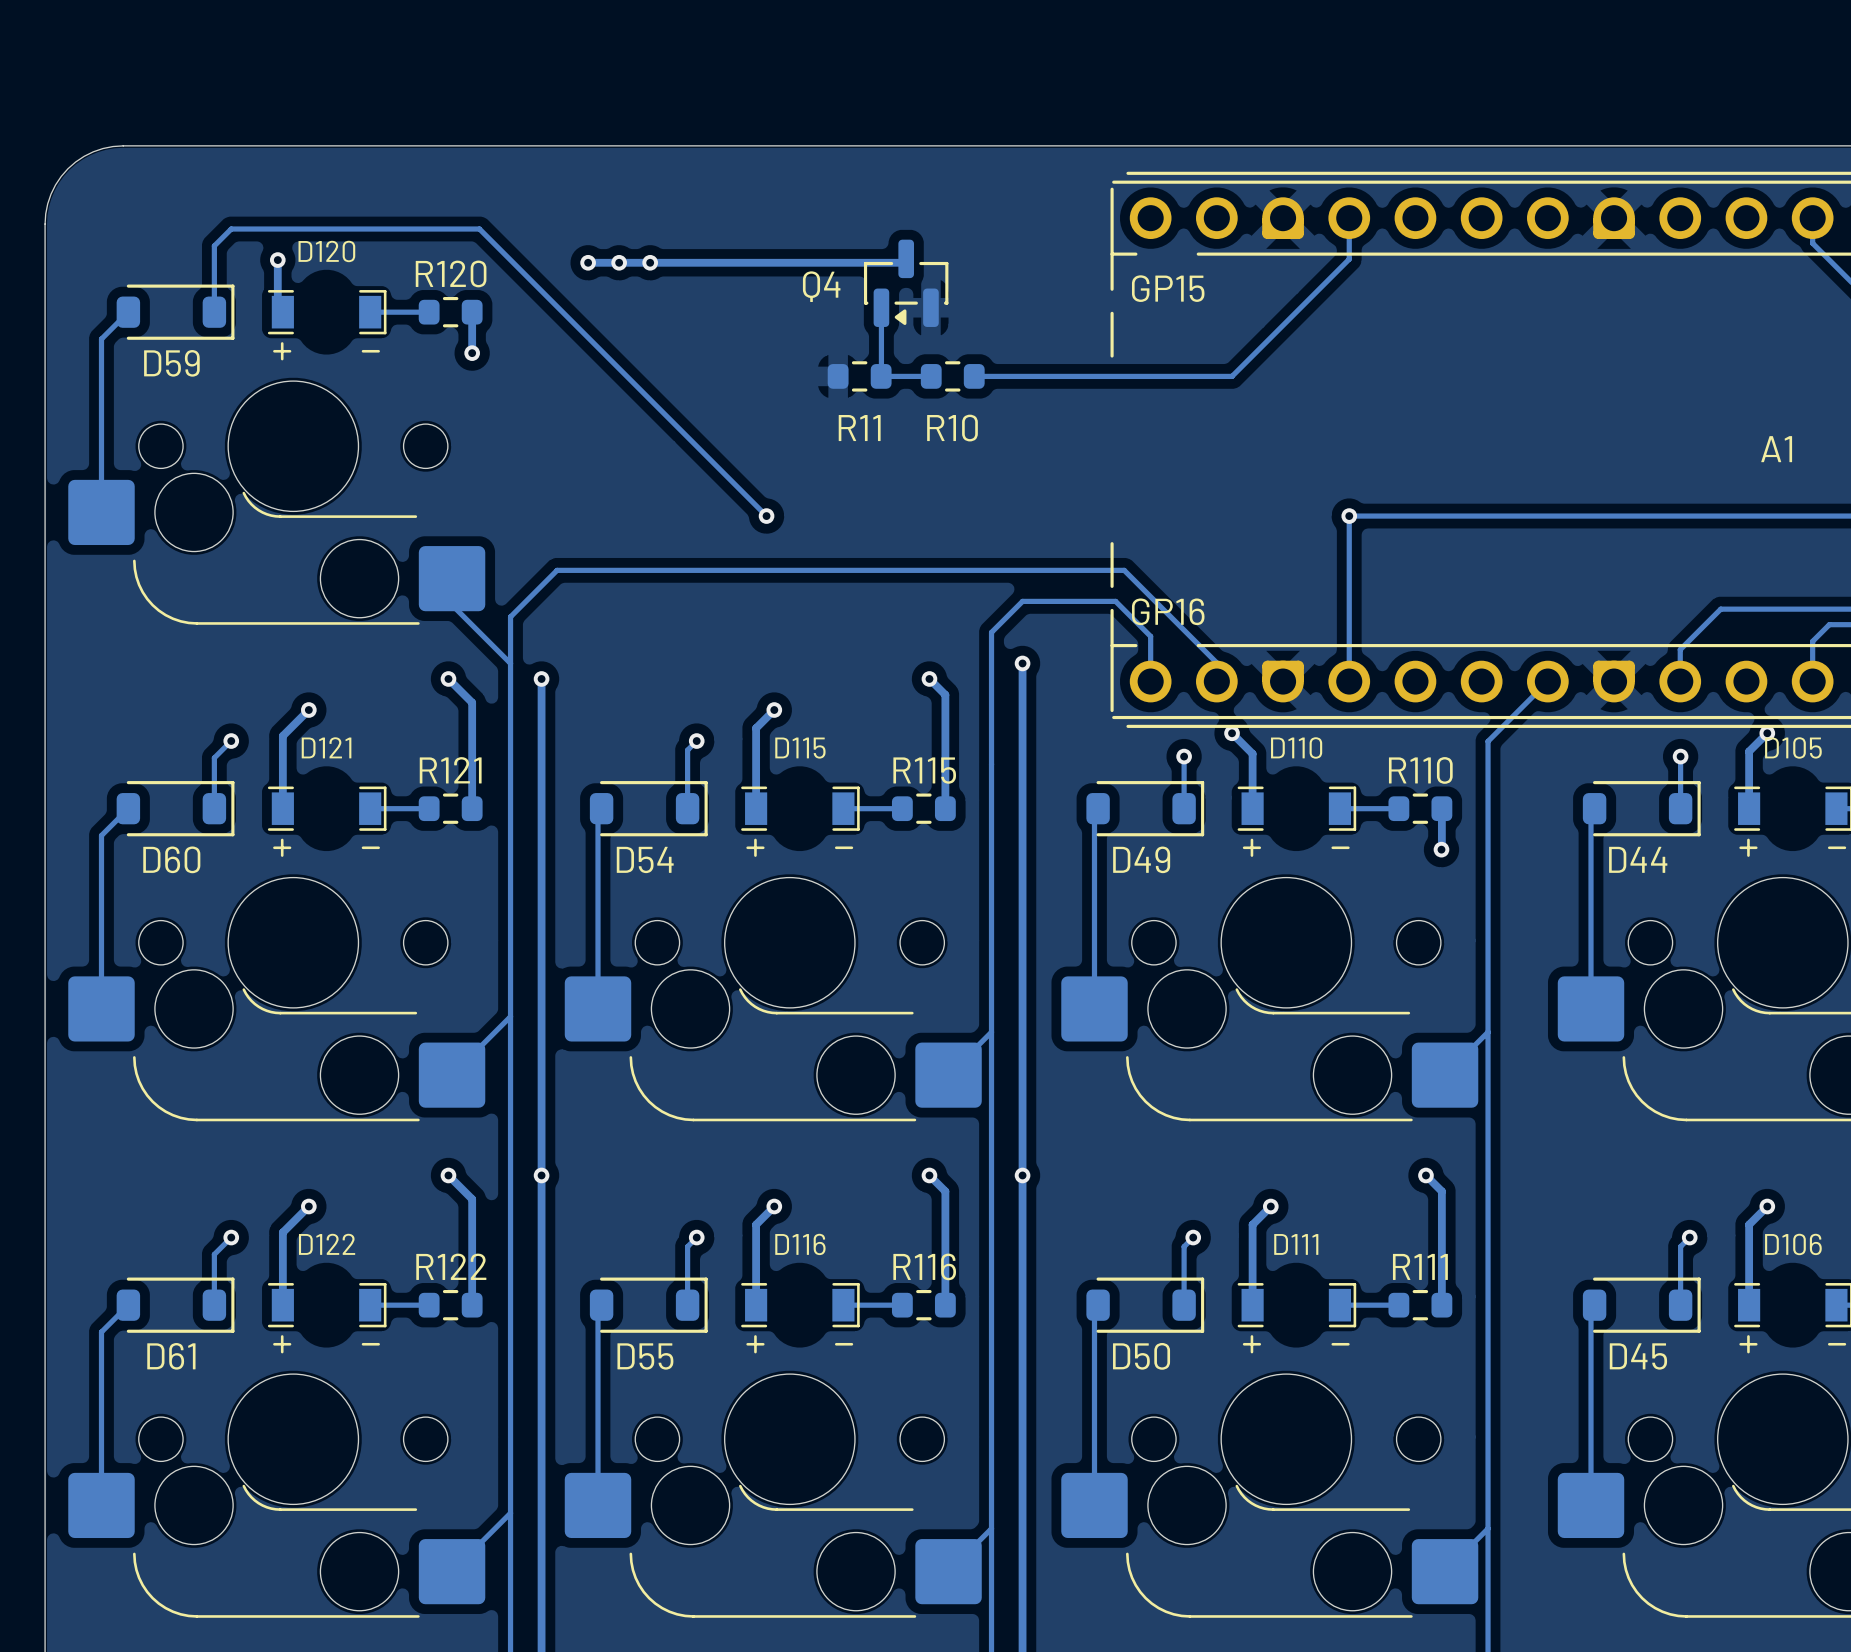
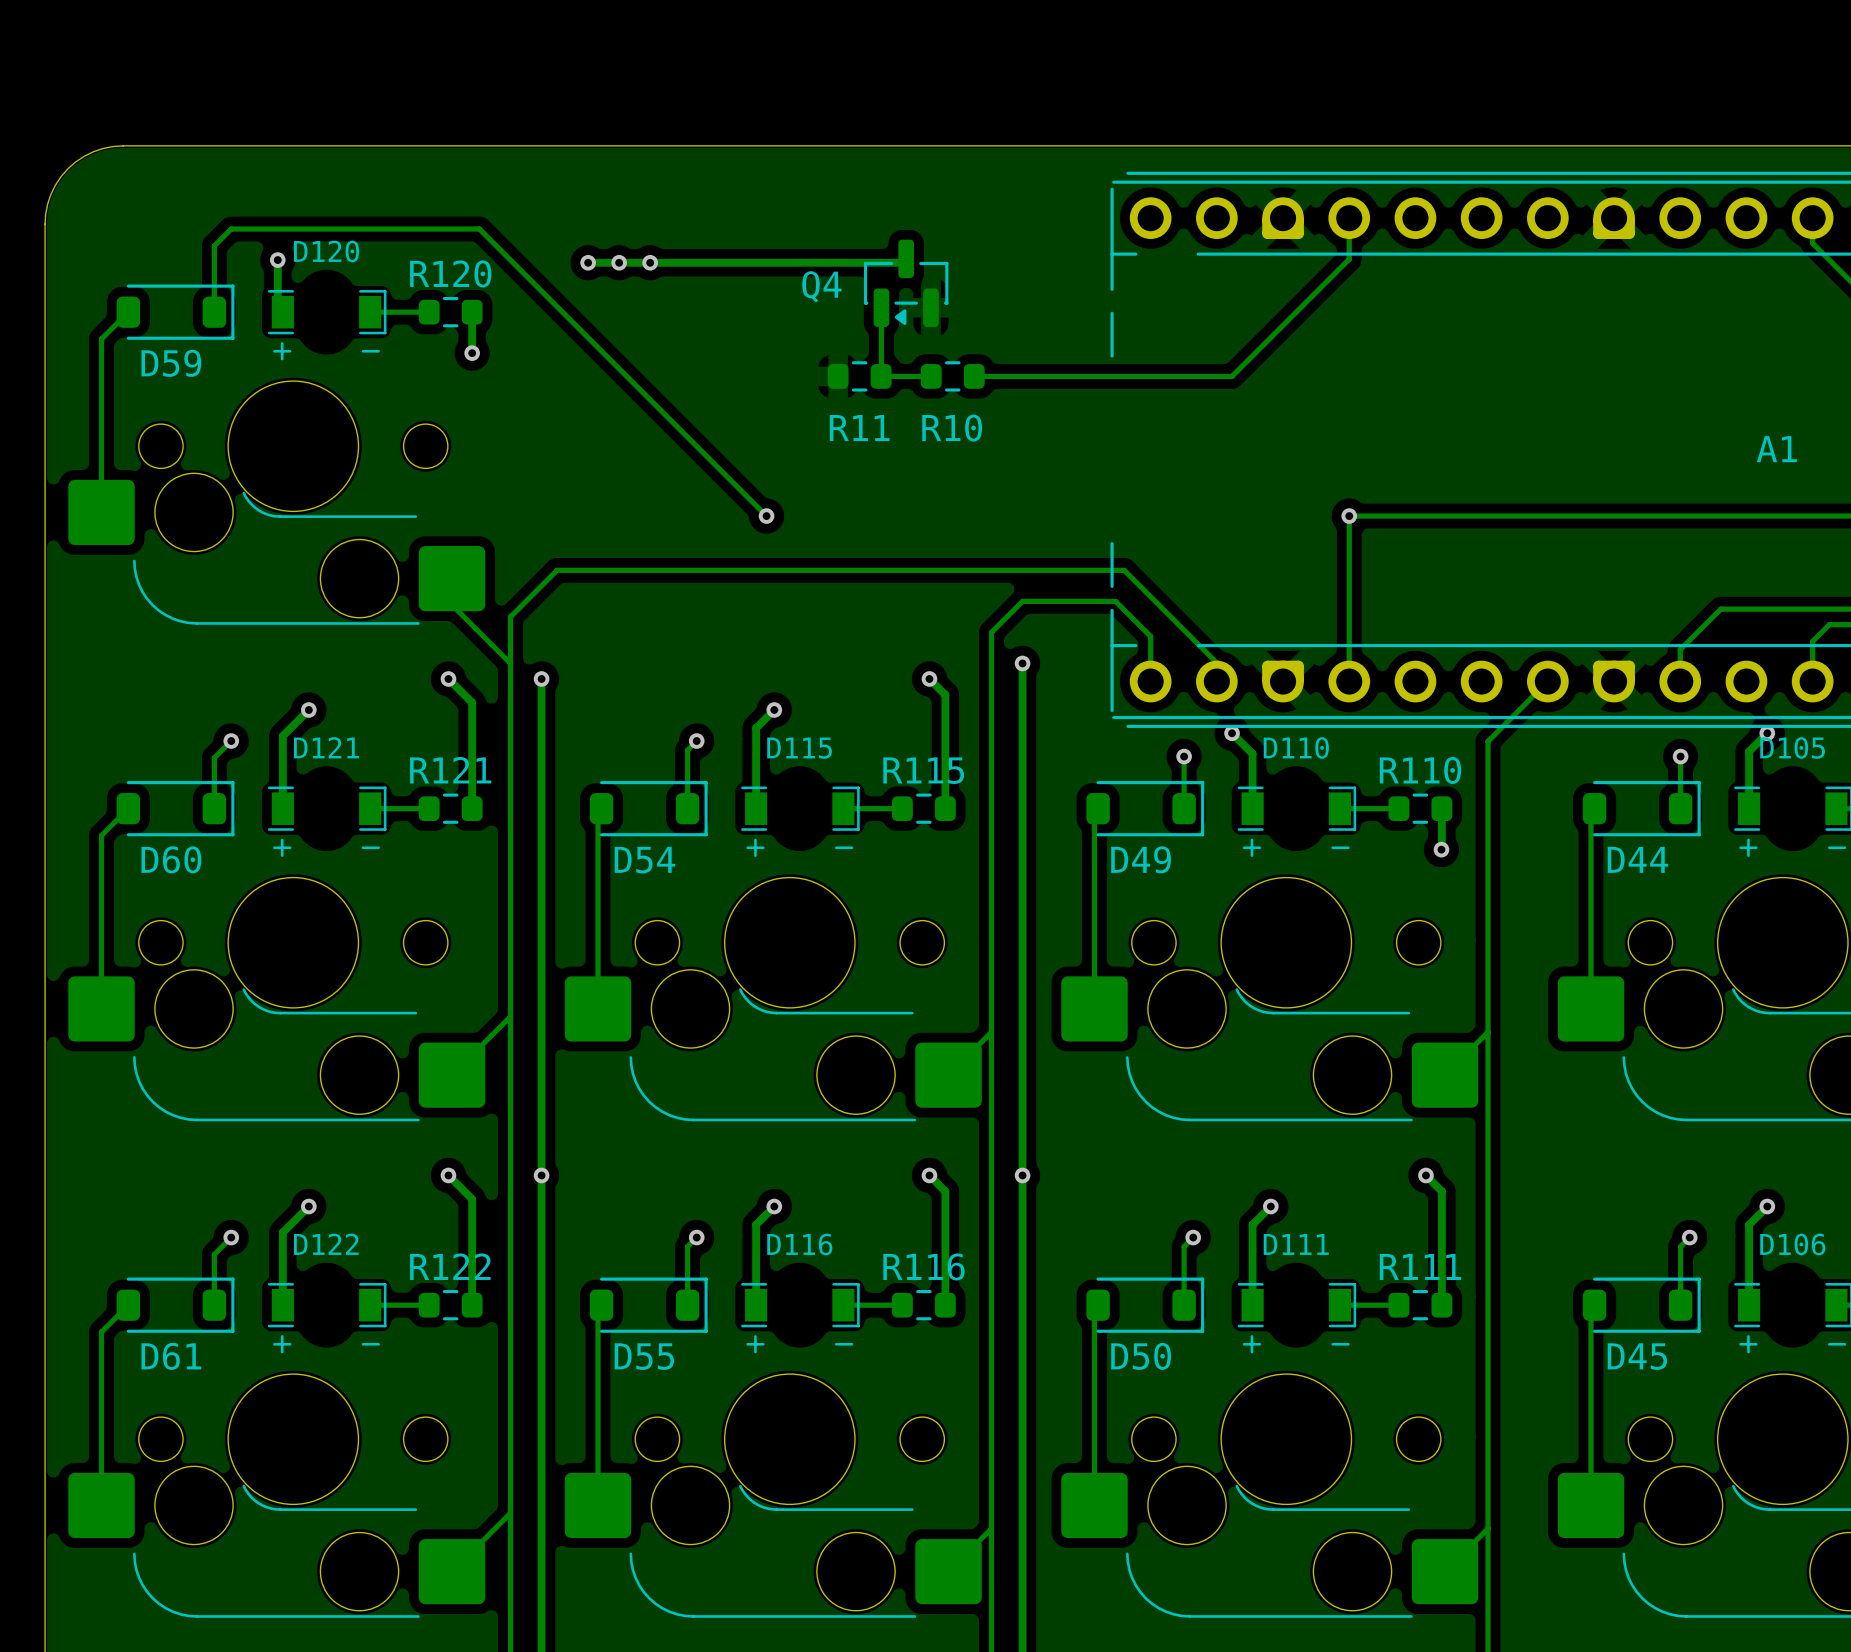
text: GP15 (1168, 288) -> none
text: GP16 (1168, 611) -> none

